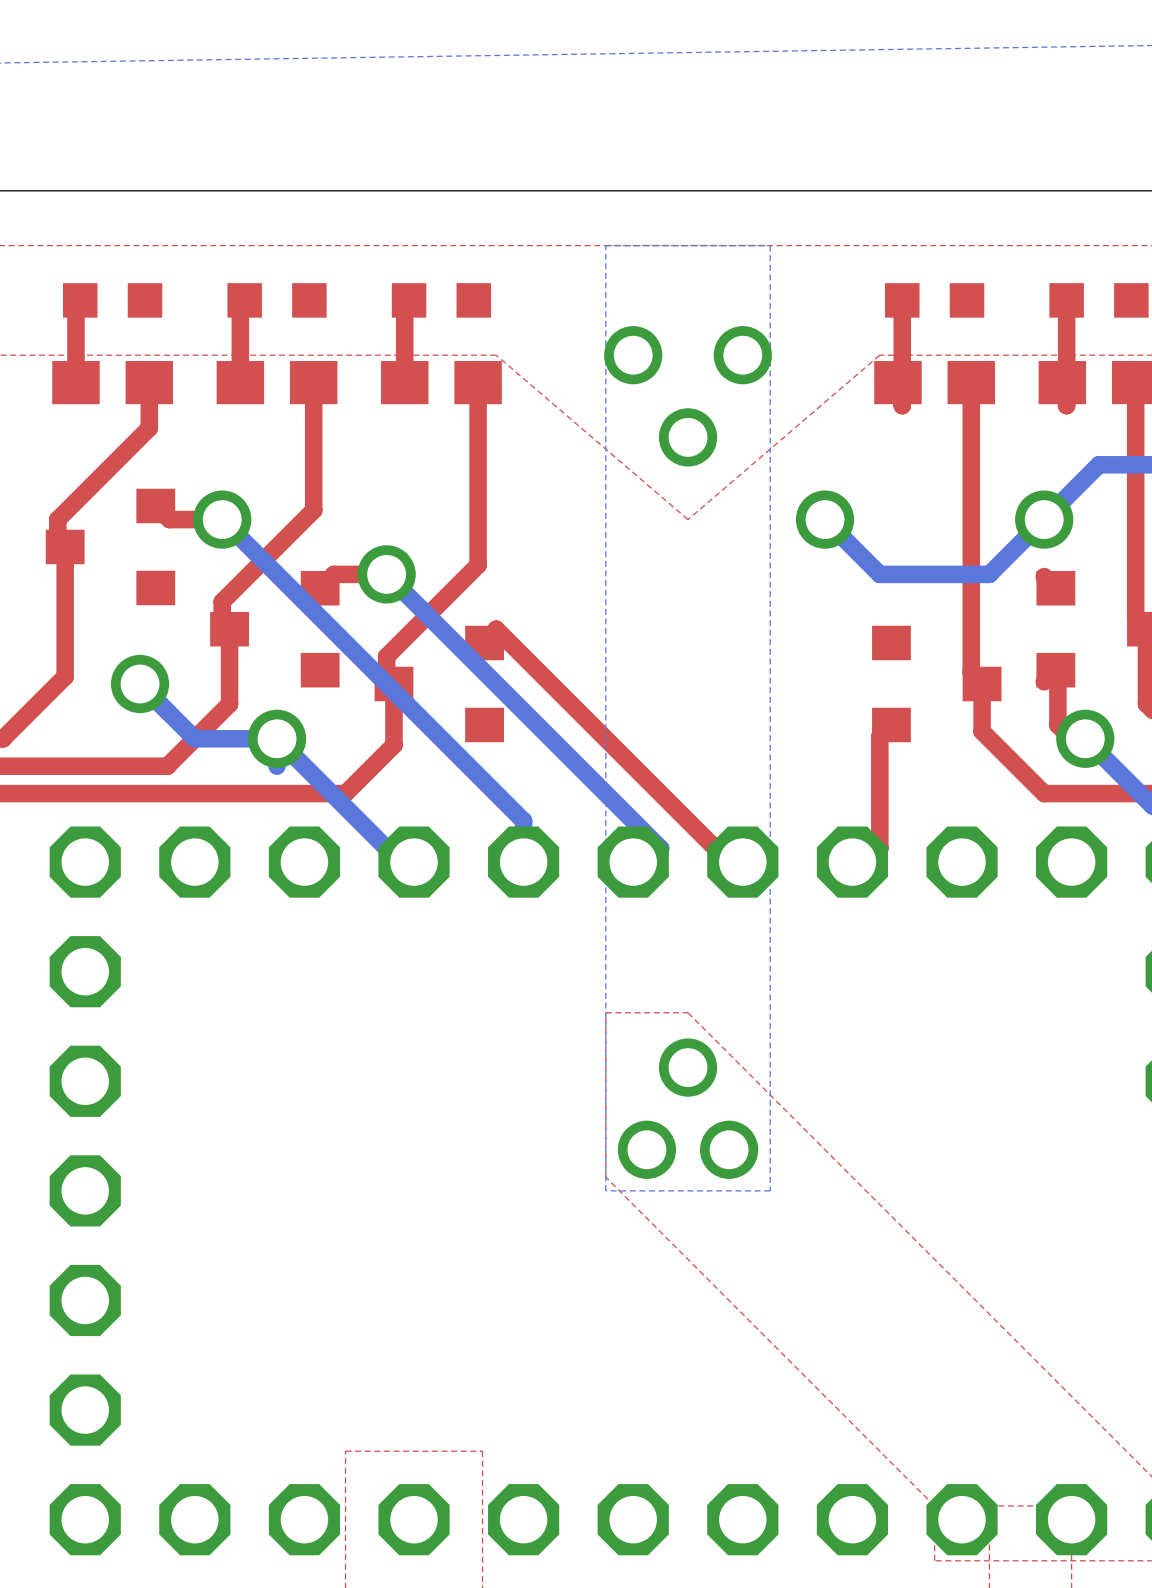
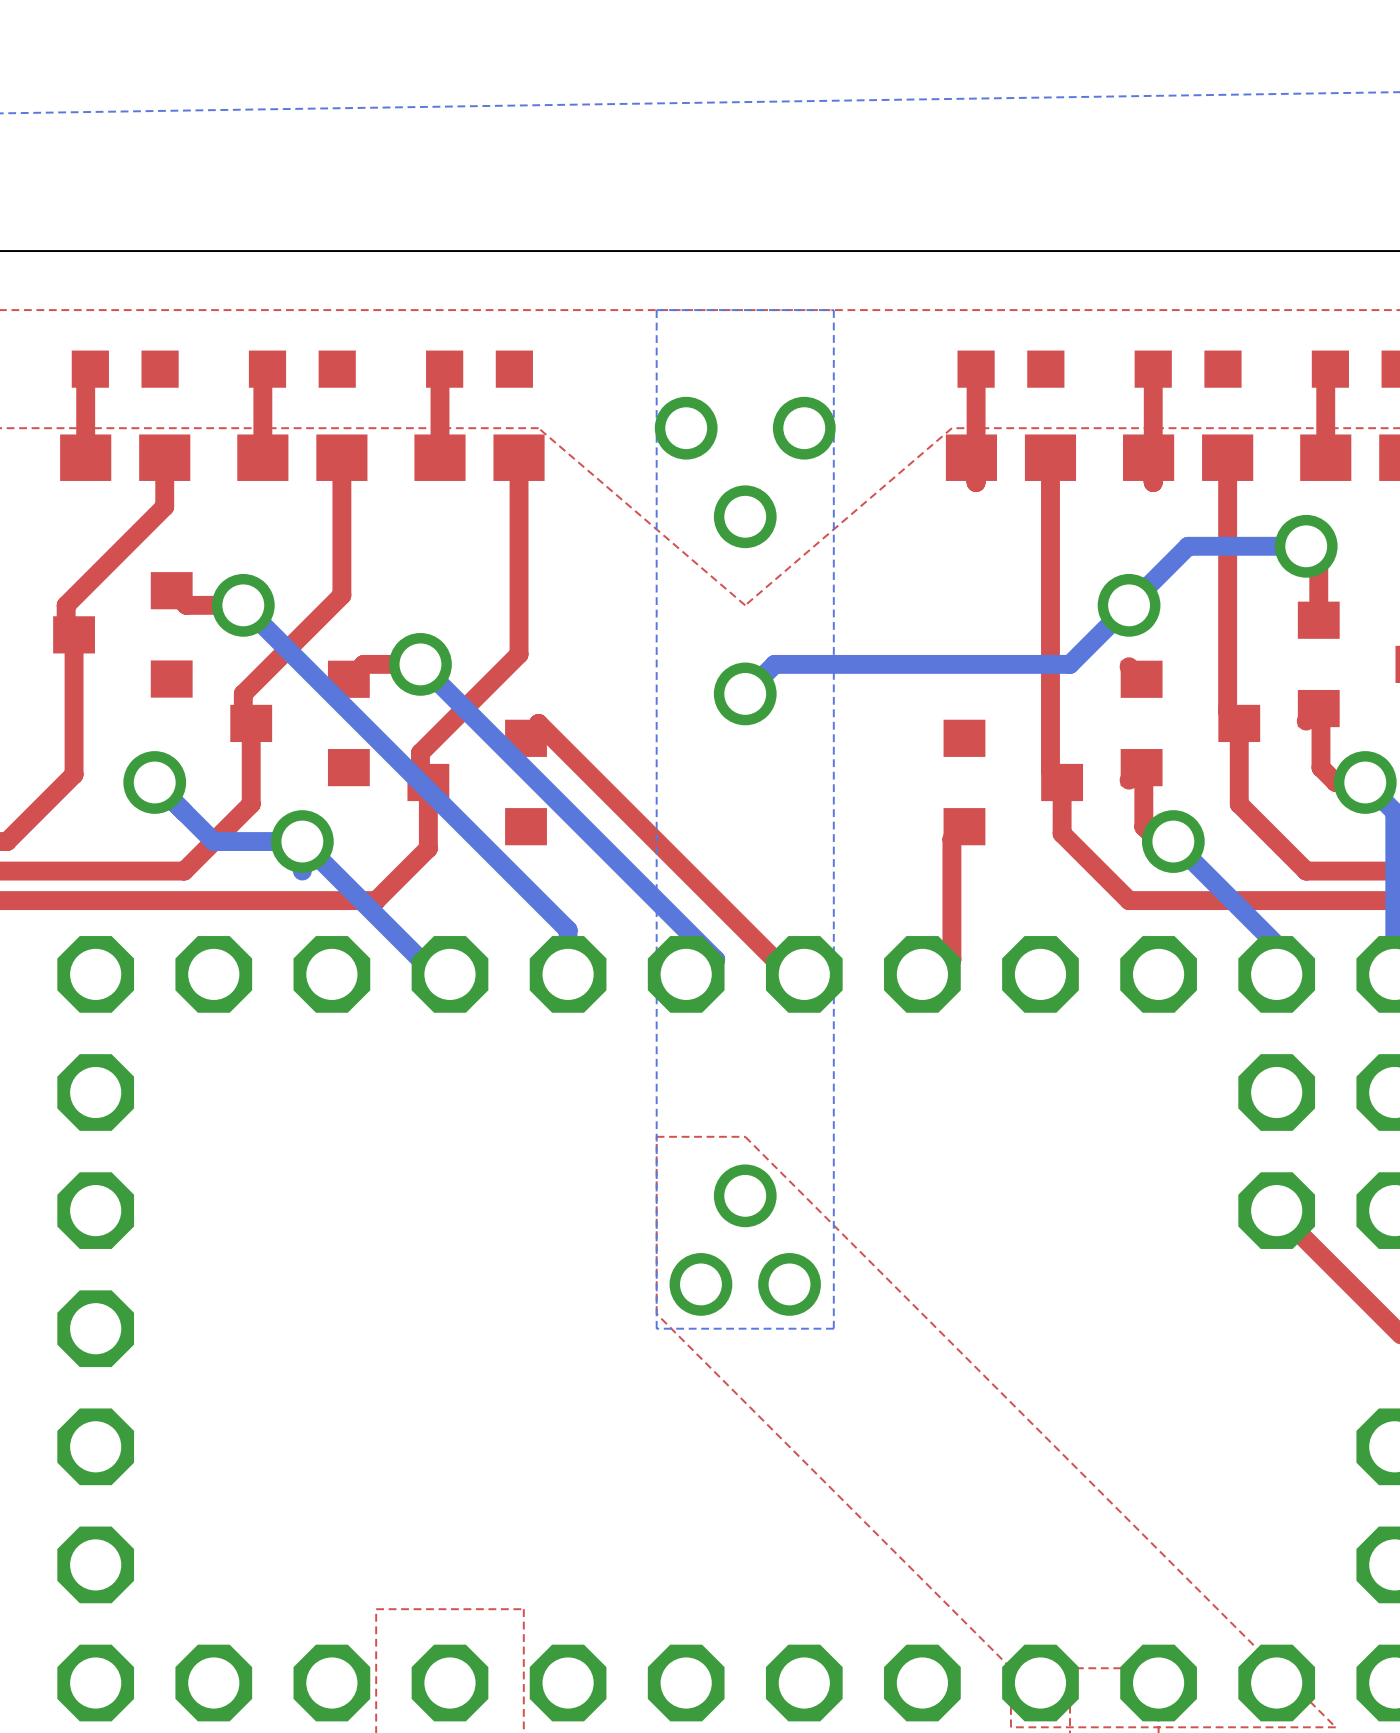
bottom track: (825, 519) (879, 574) -> (745, 693) (774, 664) (951, 664)
via position: (825, 519) -> (745, 693)

